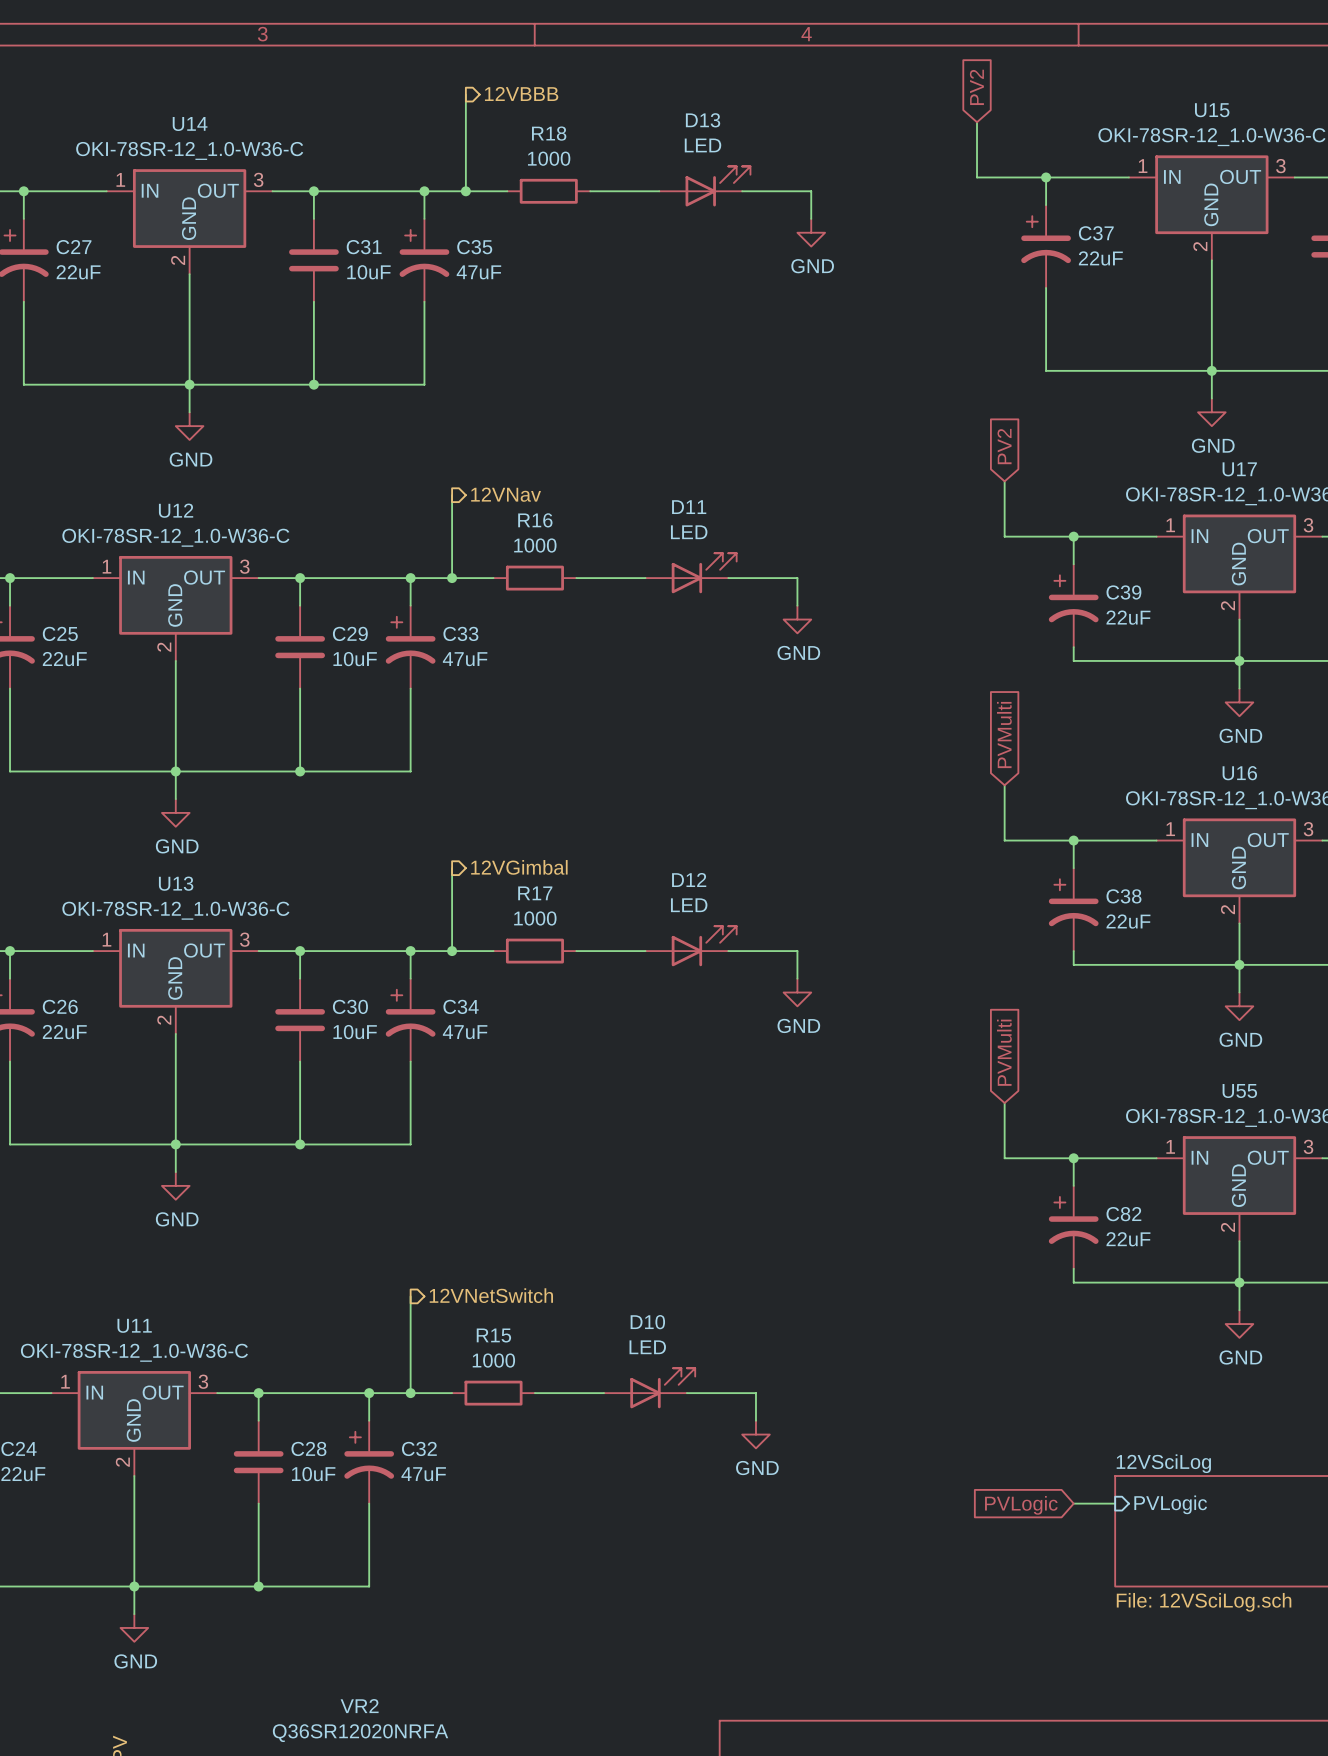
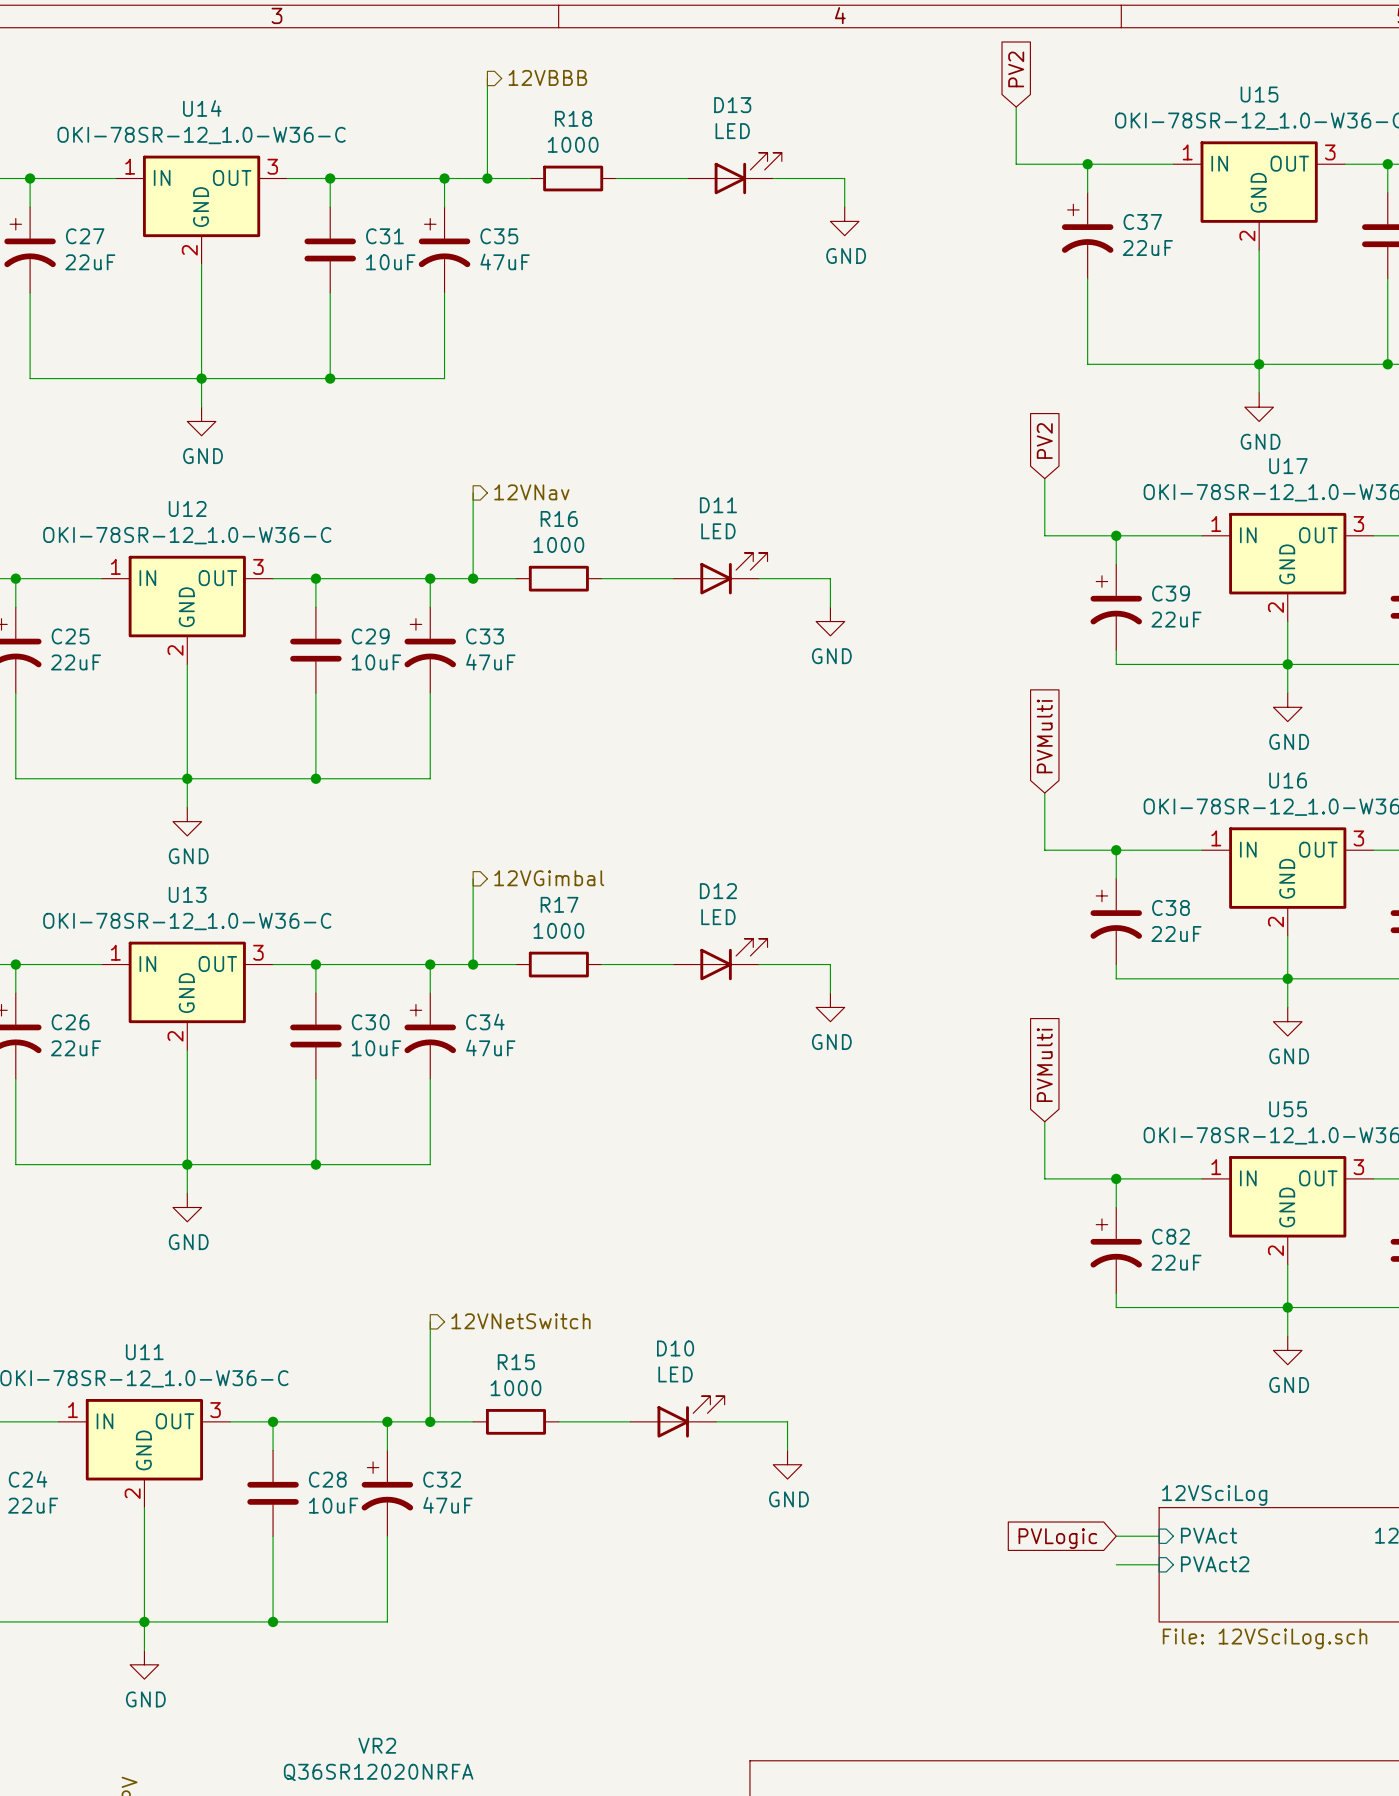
sheet pin: PVLogic (1170, 1504) -> PVAct (1209, 1535)
sheet pin: none -> PVAct2 (1215, 1564)
wire: none -> (1116, 1564) (1159, 1564)

